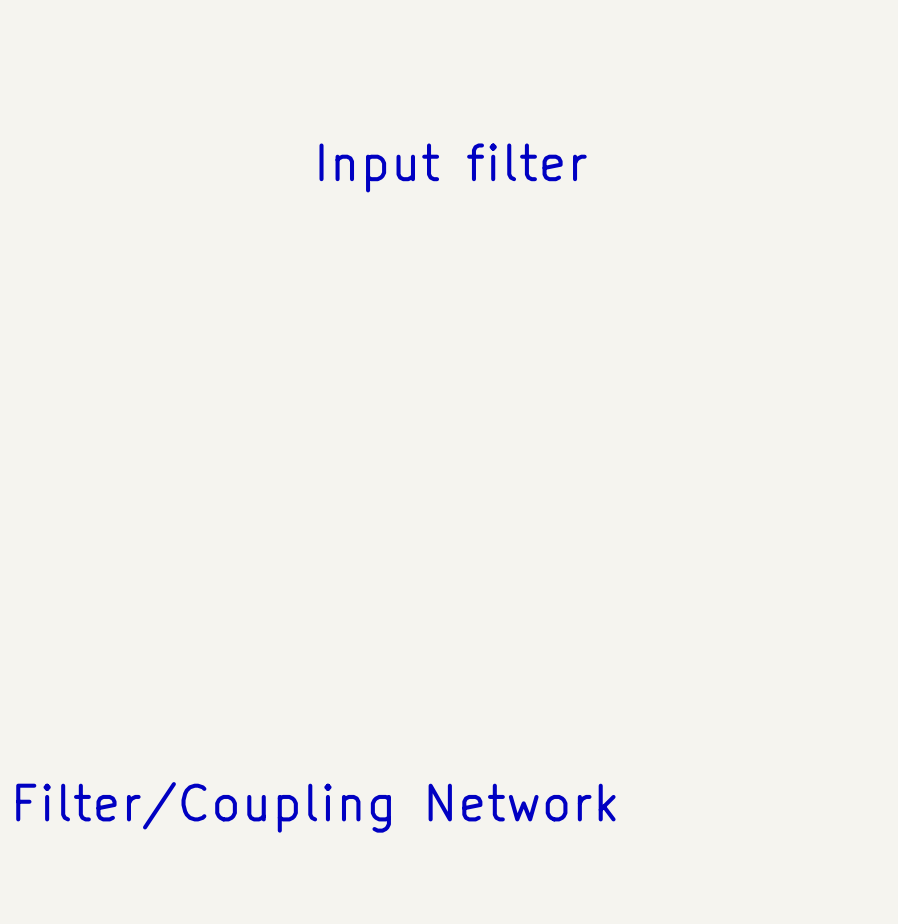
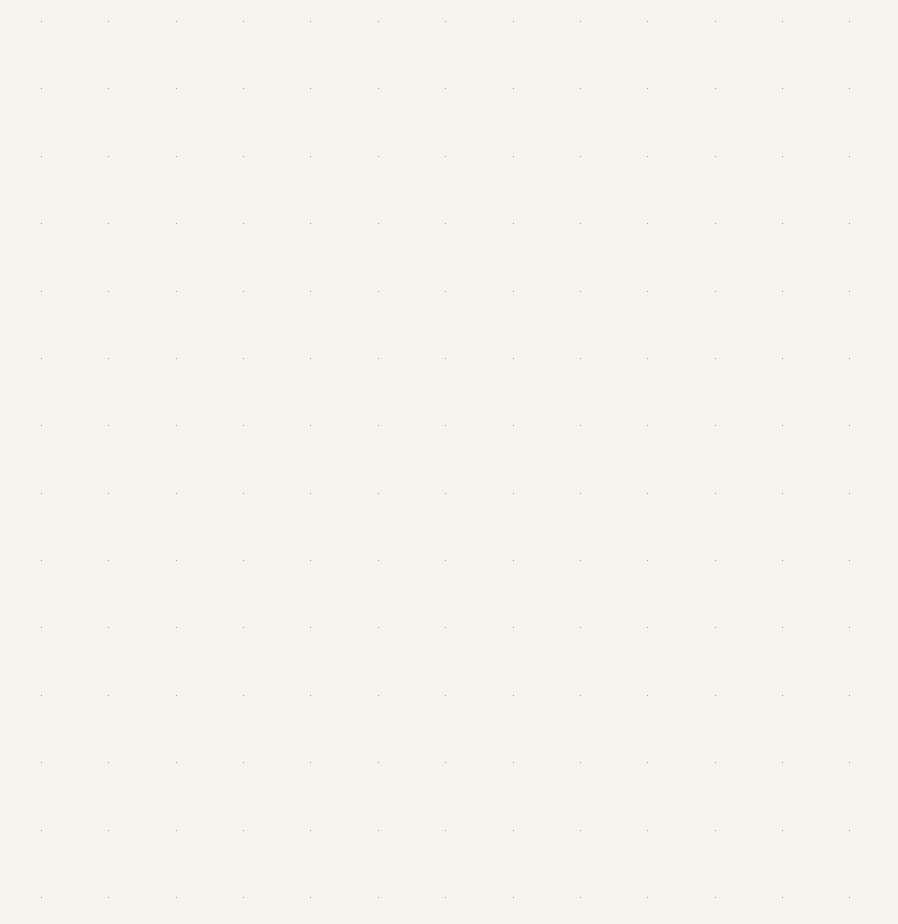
text: Input filter (453, 167) -> none
text: Filter/Coupling Network (315, 807) -> none

